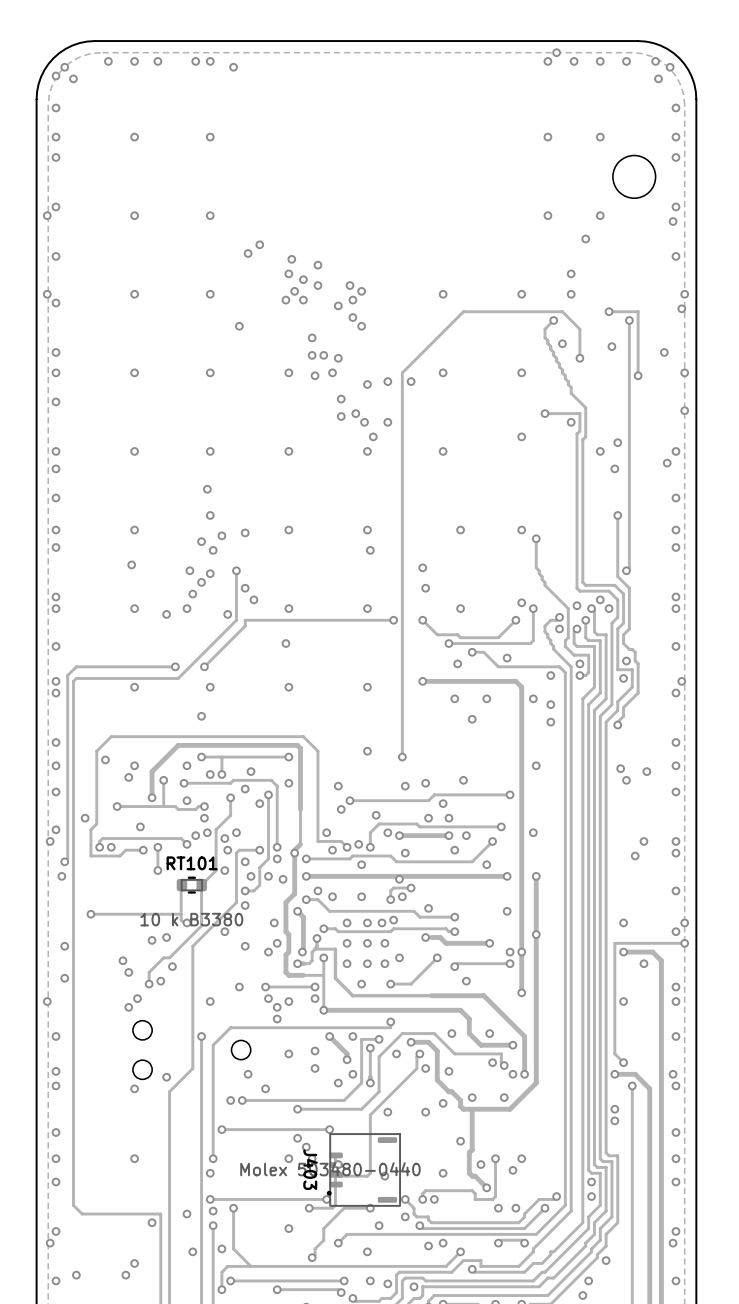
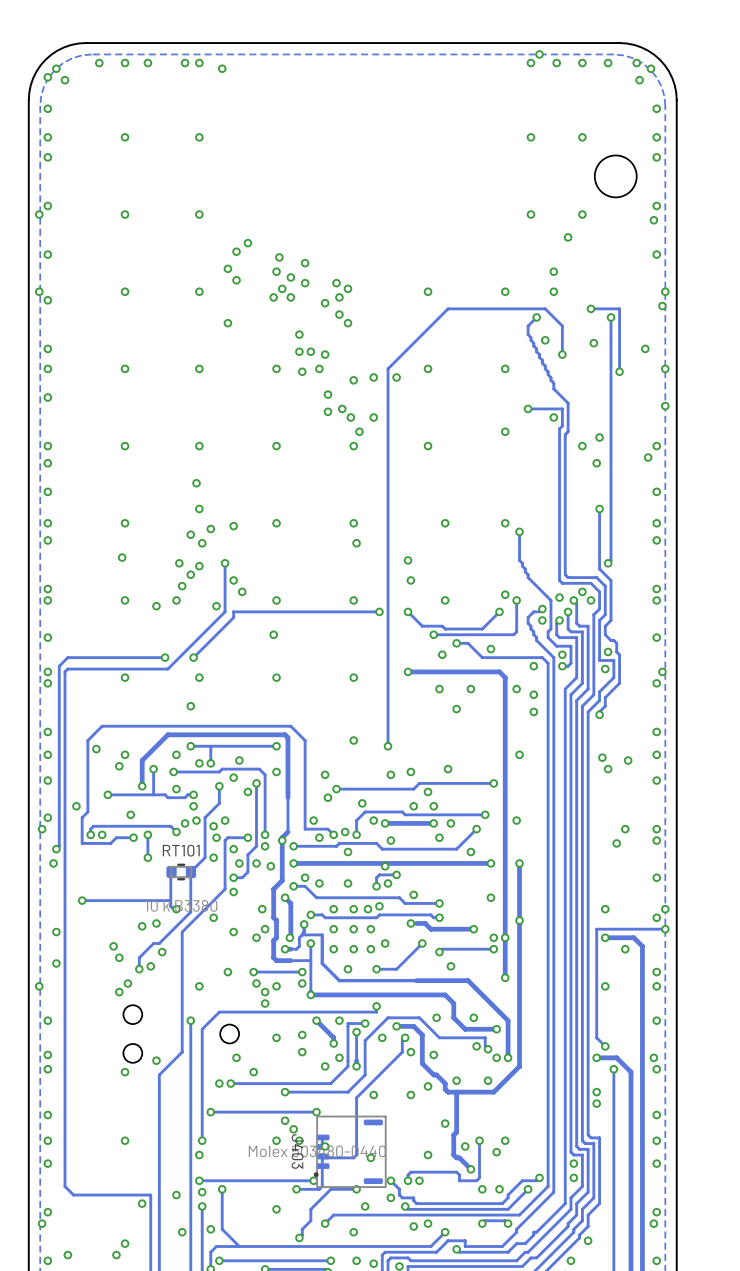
via: none -> (227, 268)
via: none -> (236, 280)

